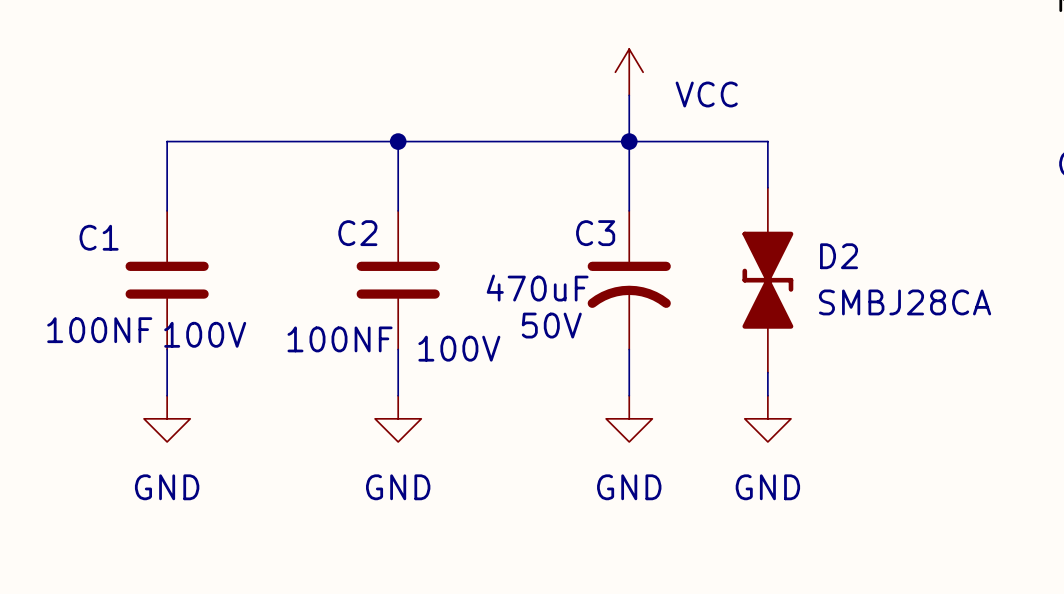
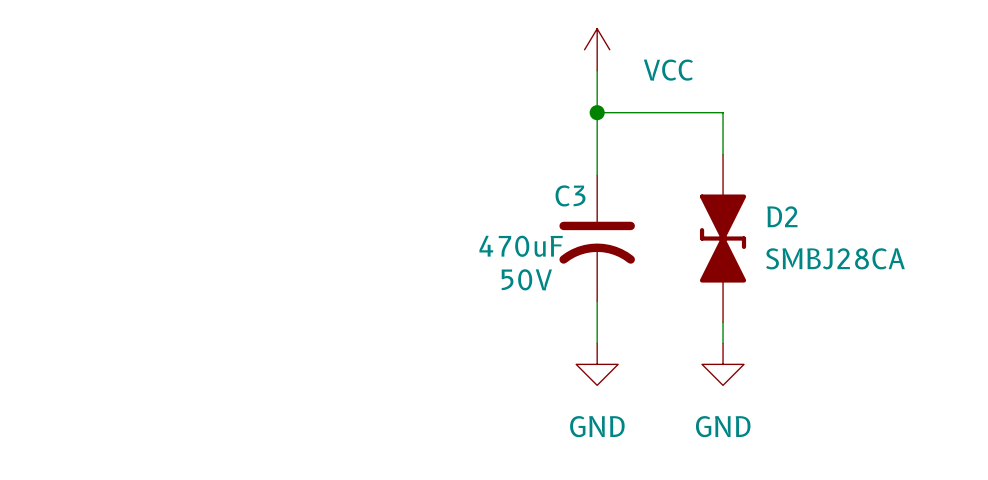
wire: (398, 141) (398, 210) -> none
junction: (398, 141) -> none
wire: (629, 141) (167, 141) (167, 210) -> none
C1: 100NF (167, 280) -> none
C2: 100NF (398, 280) -> none
wire: (167, 349) (167, 395) -> none
wire: (398, 349) (398, 395) -> none
power symbol: GND (167, 418) -> none
power symbol: GND (398, 418) -> none

